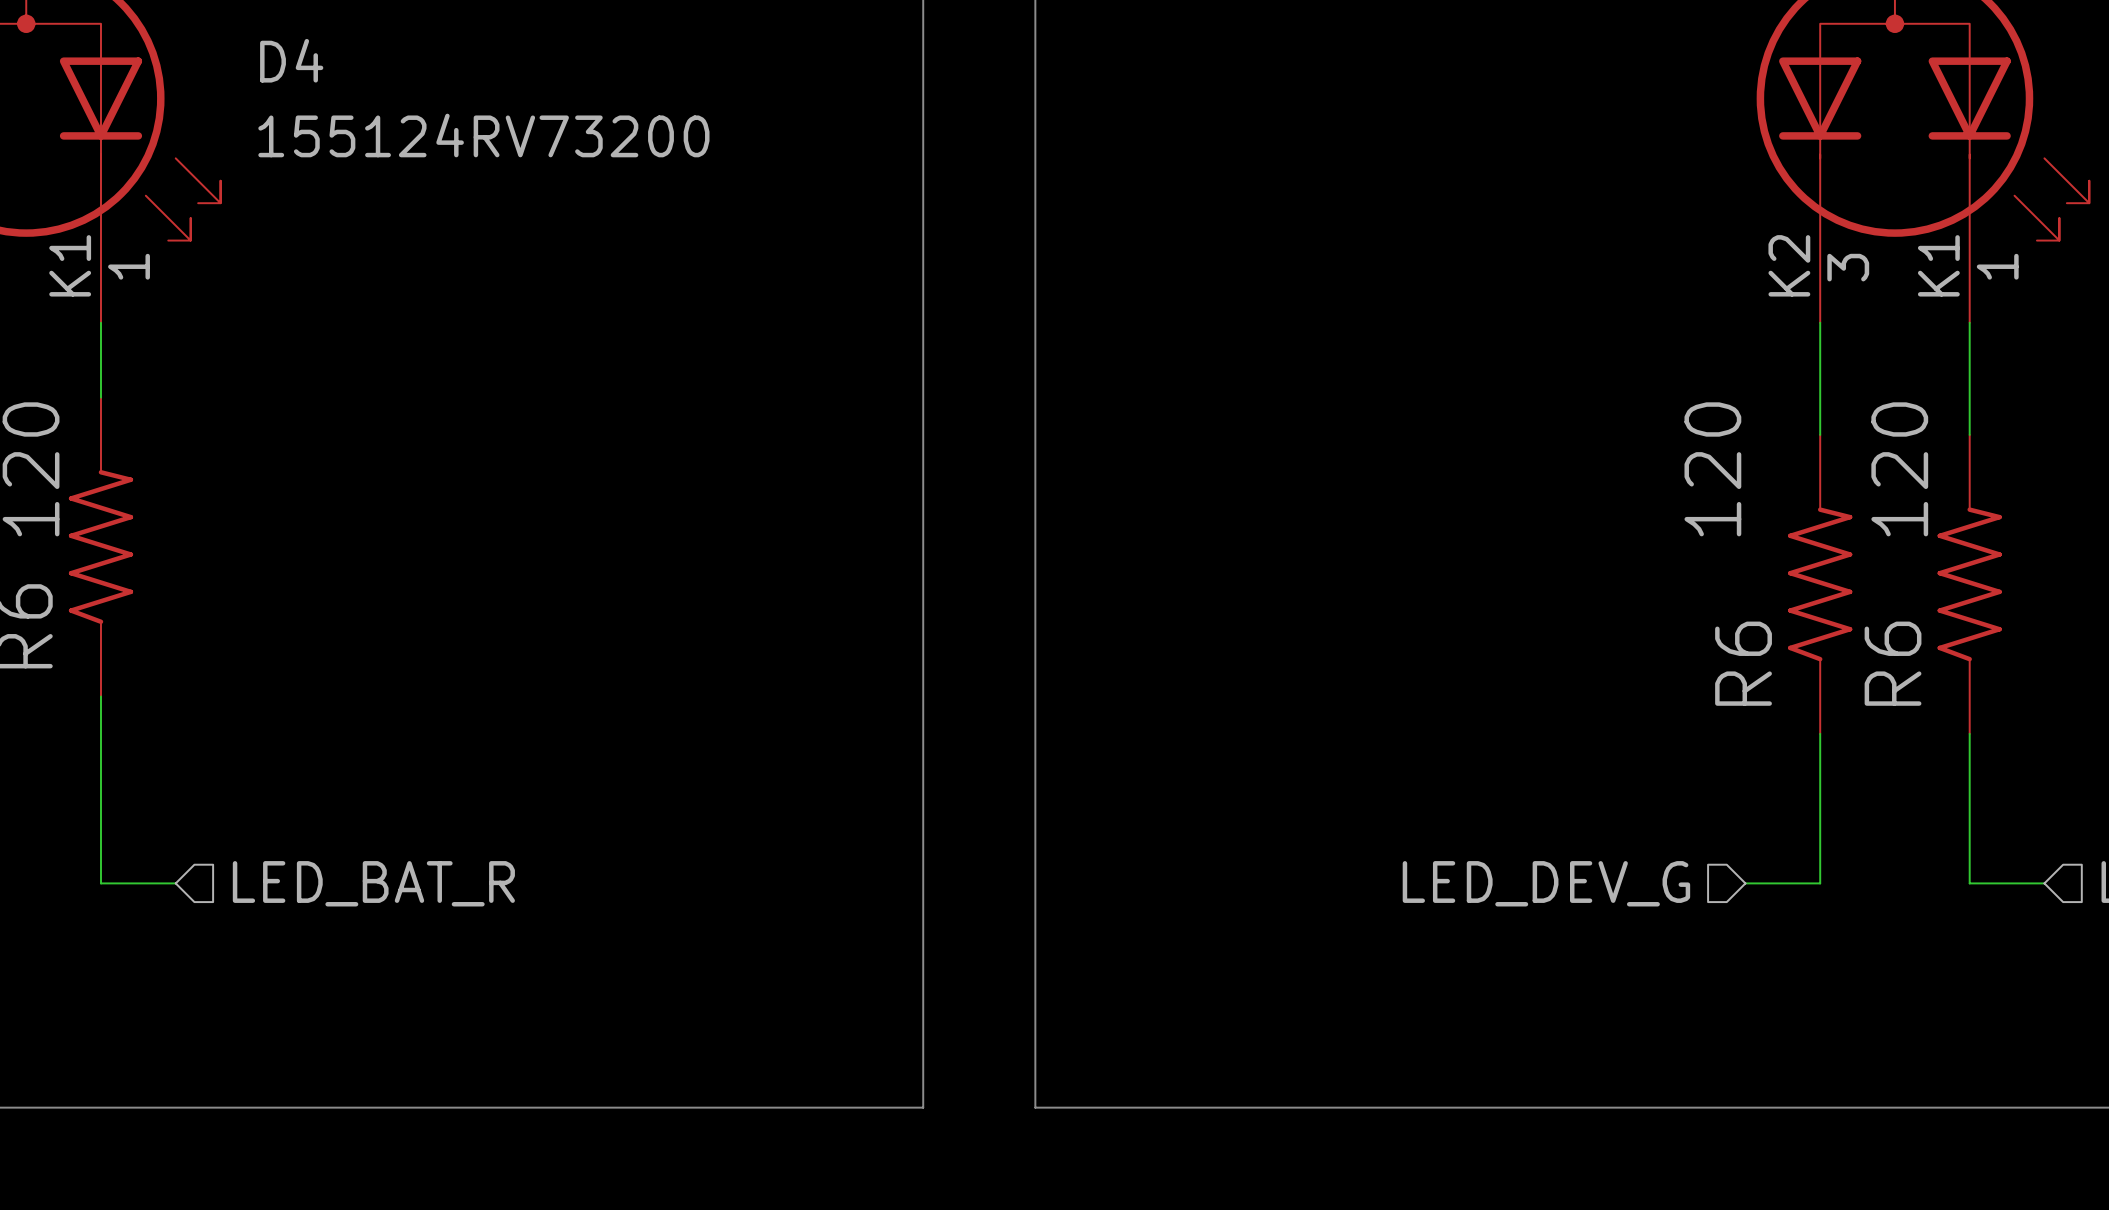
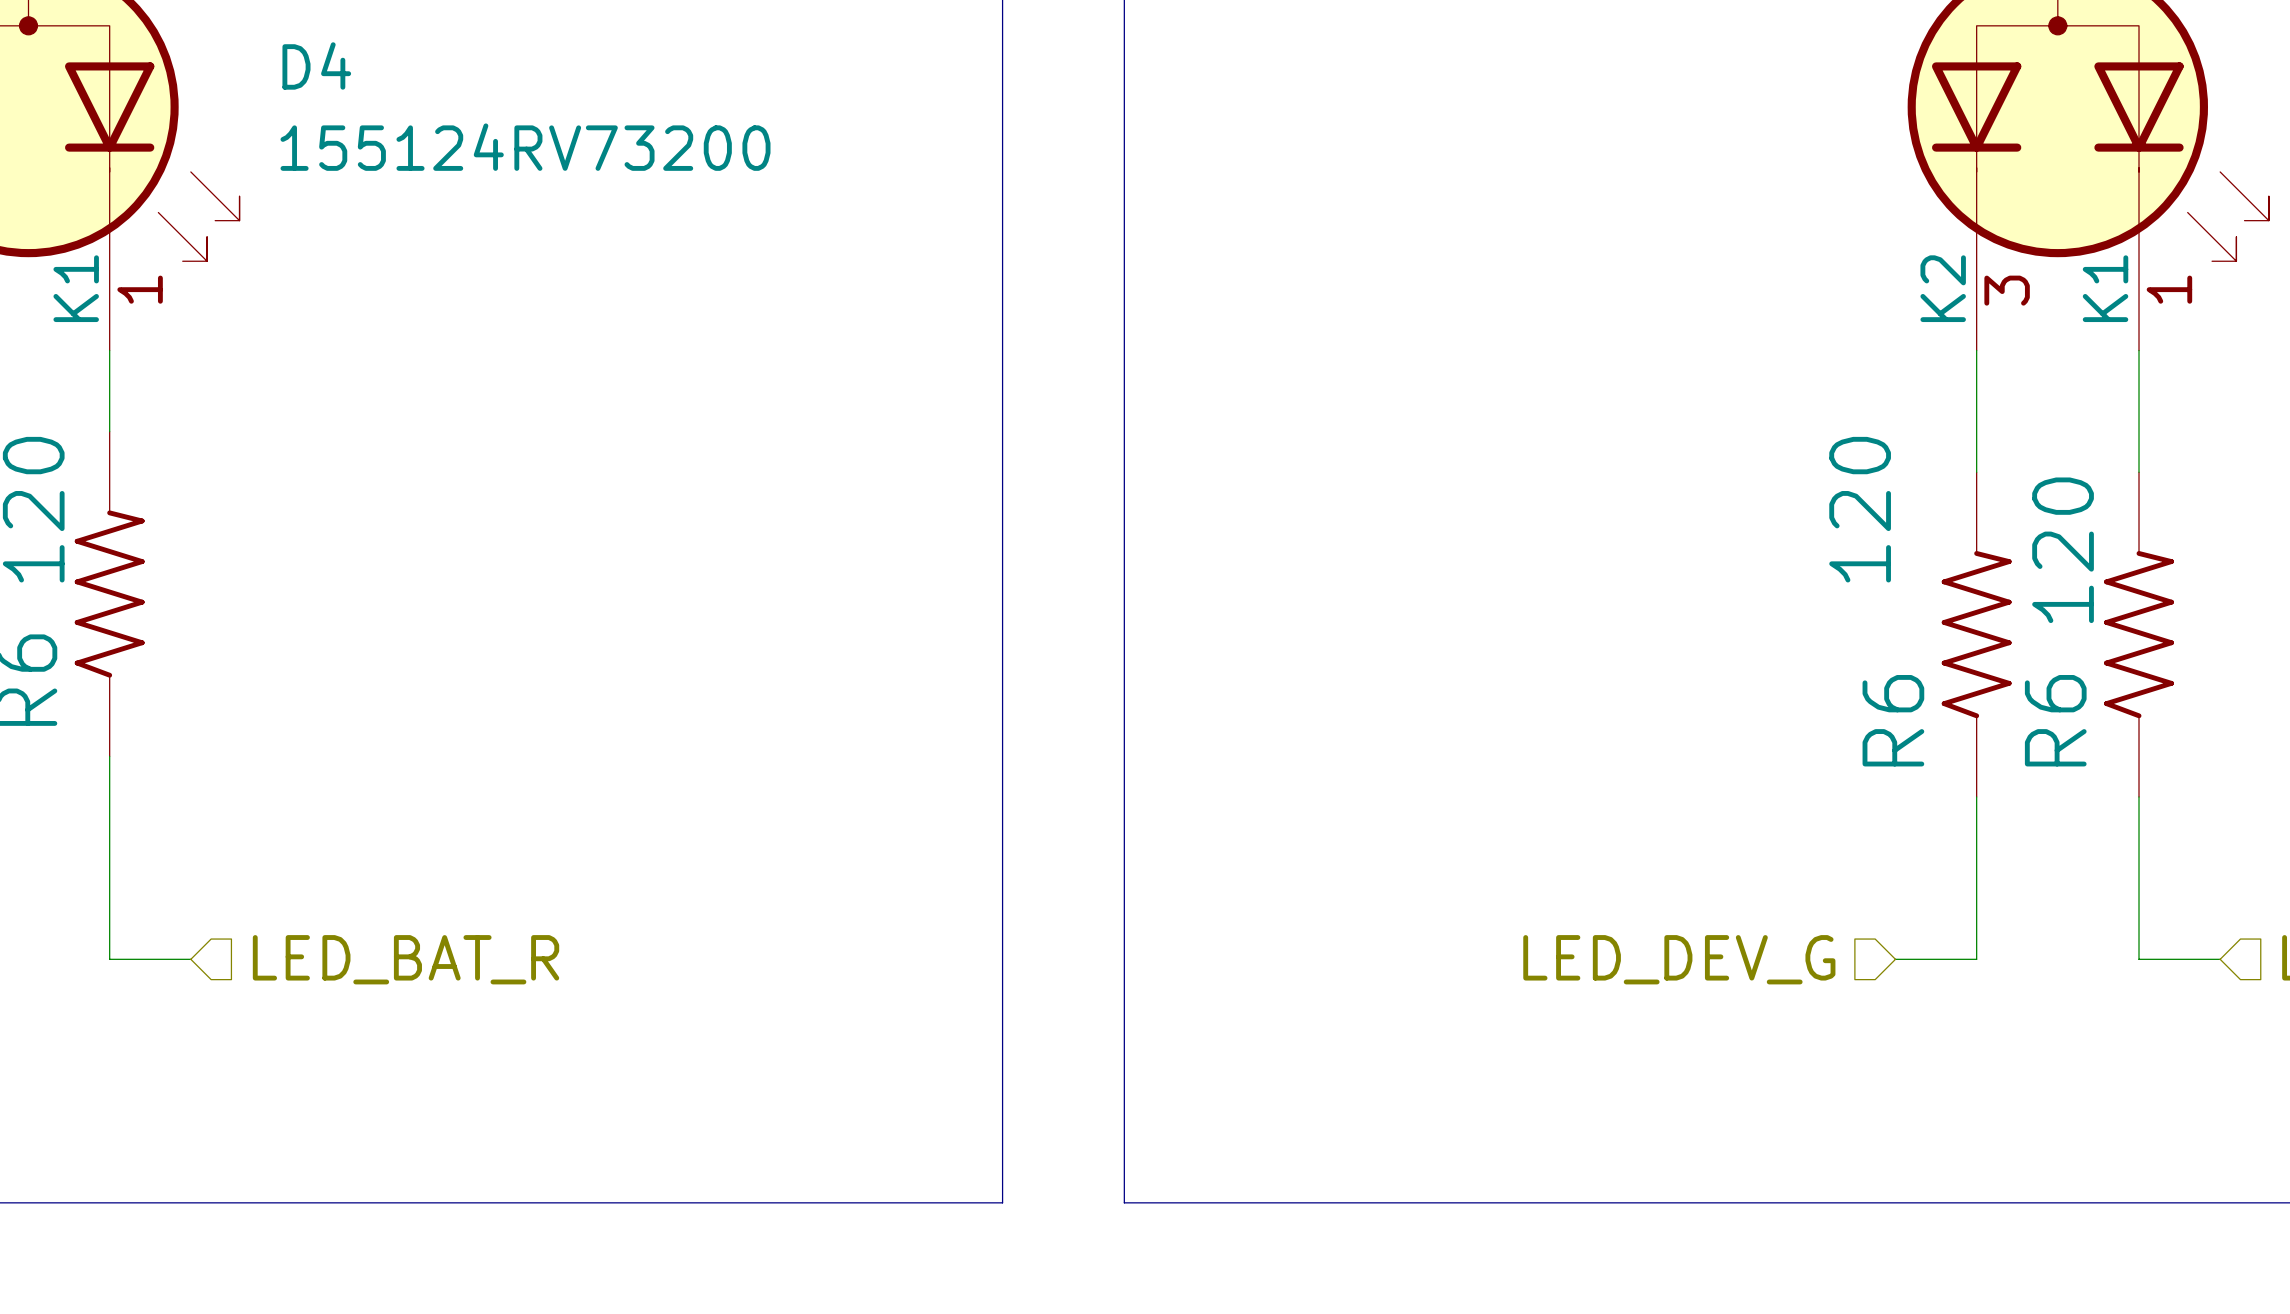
R6 value position: 120 (1899, 469) -> 120 (2063, 550)

